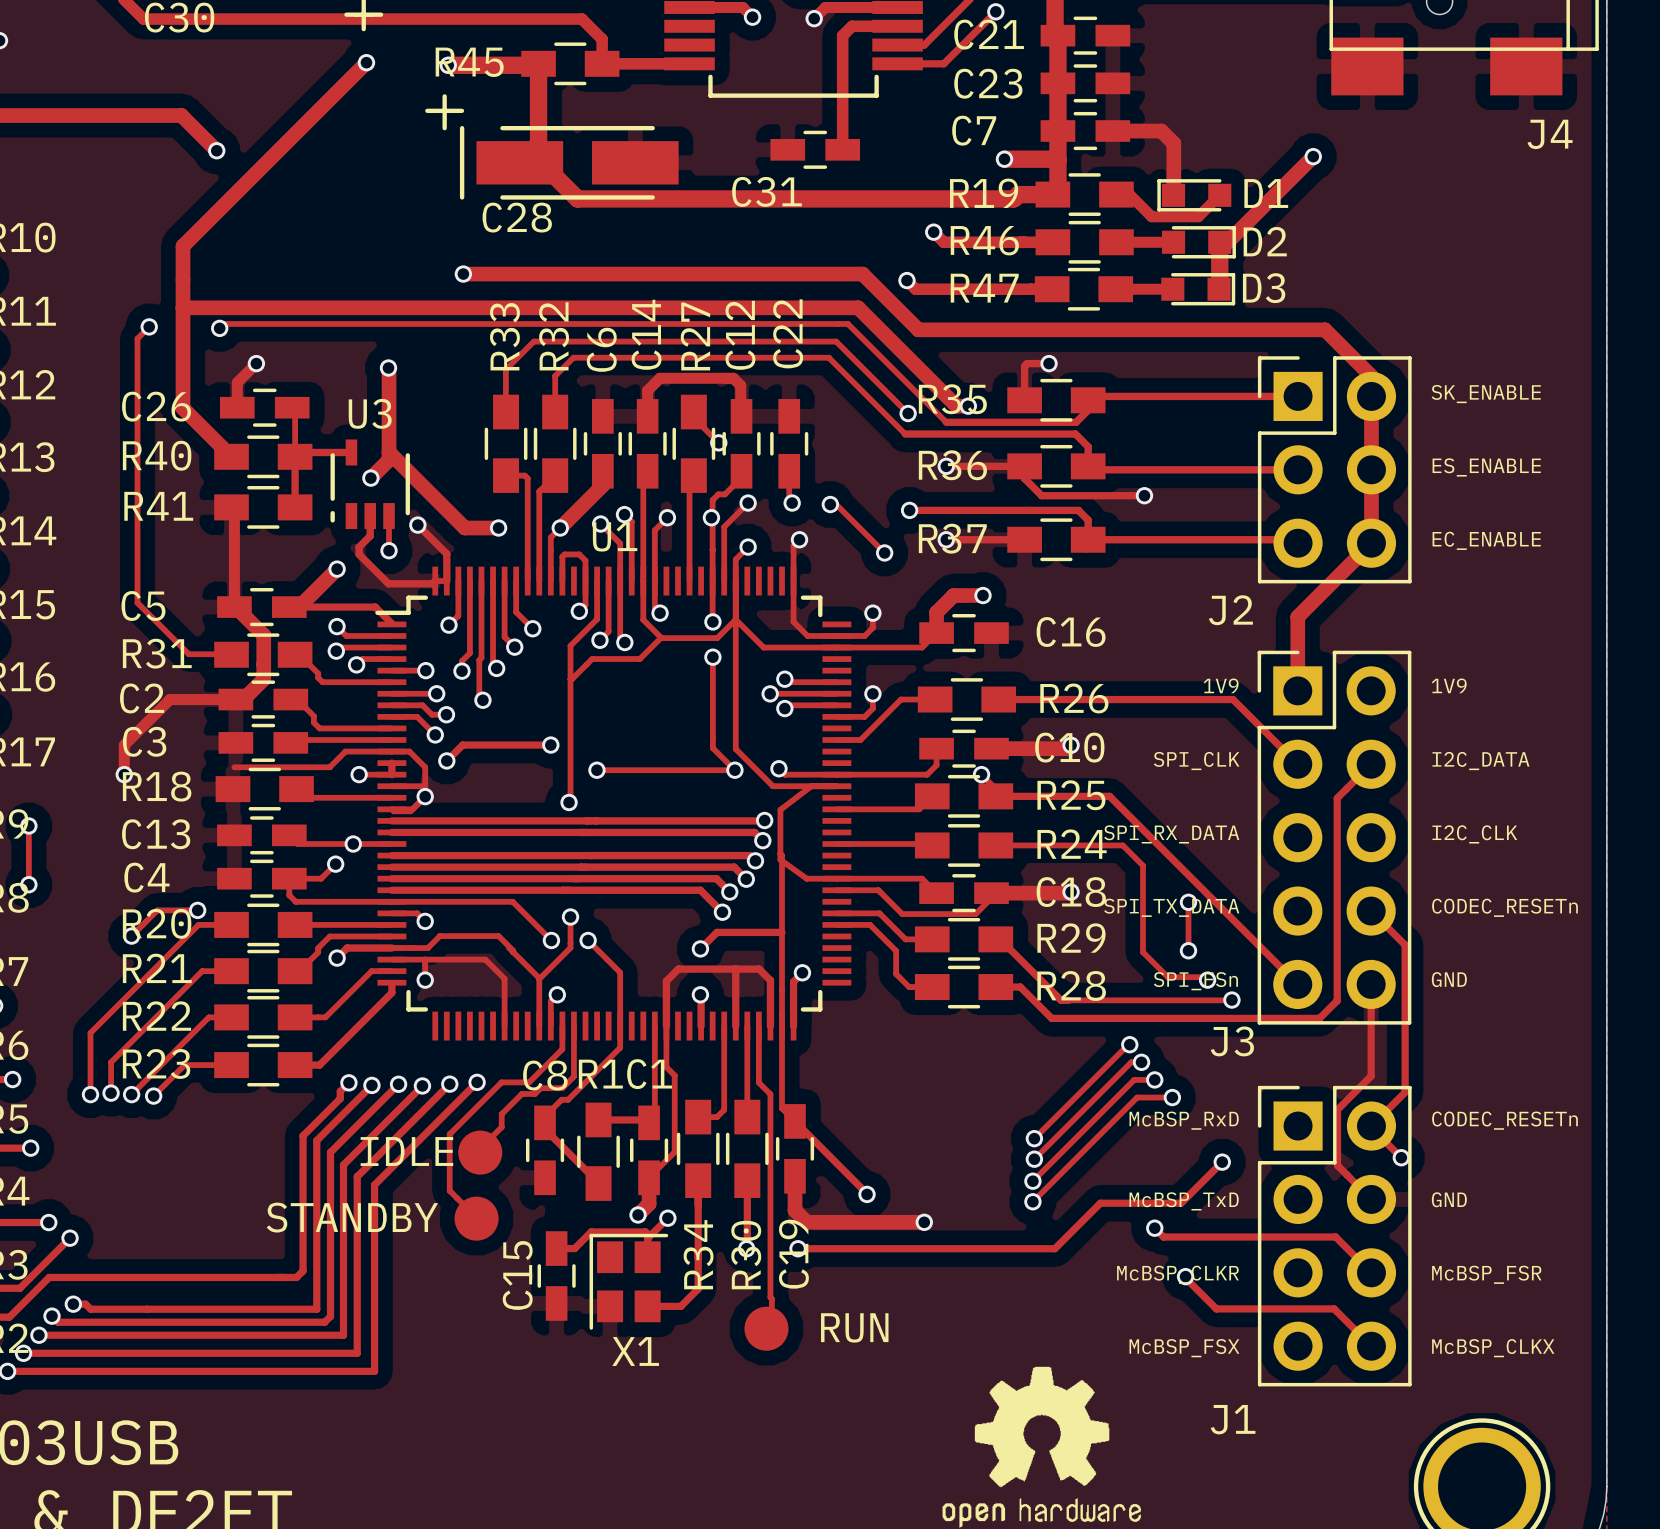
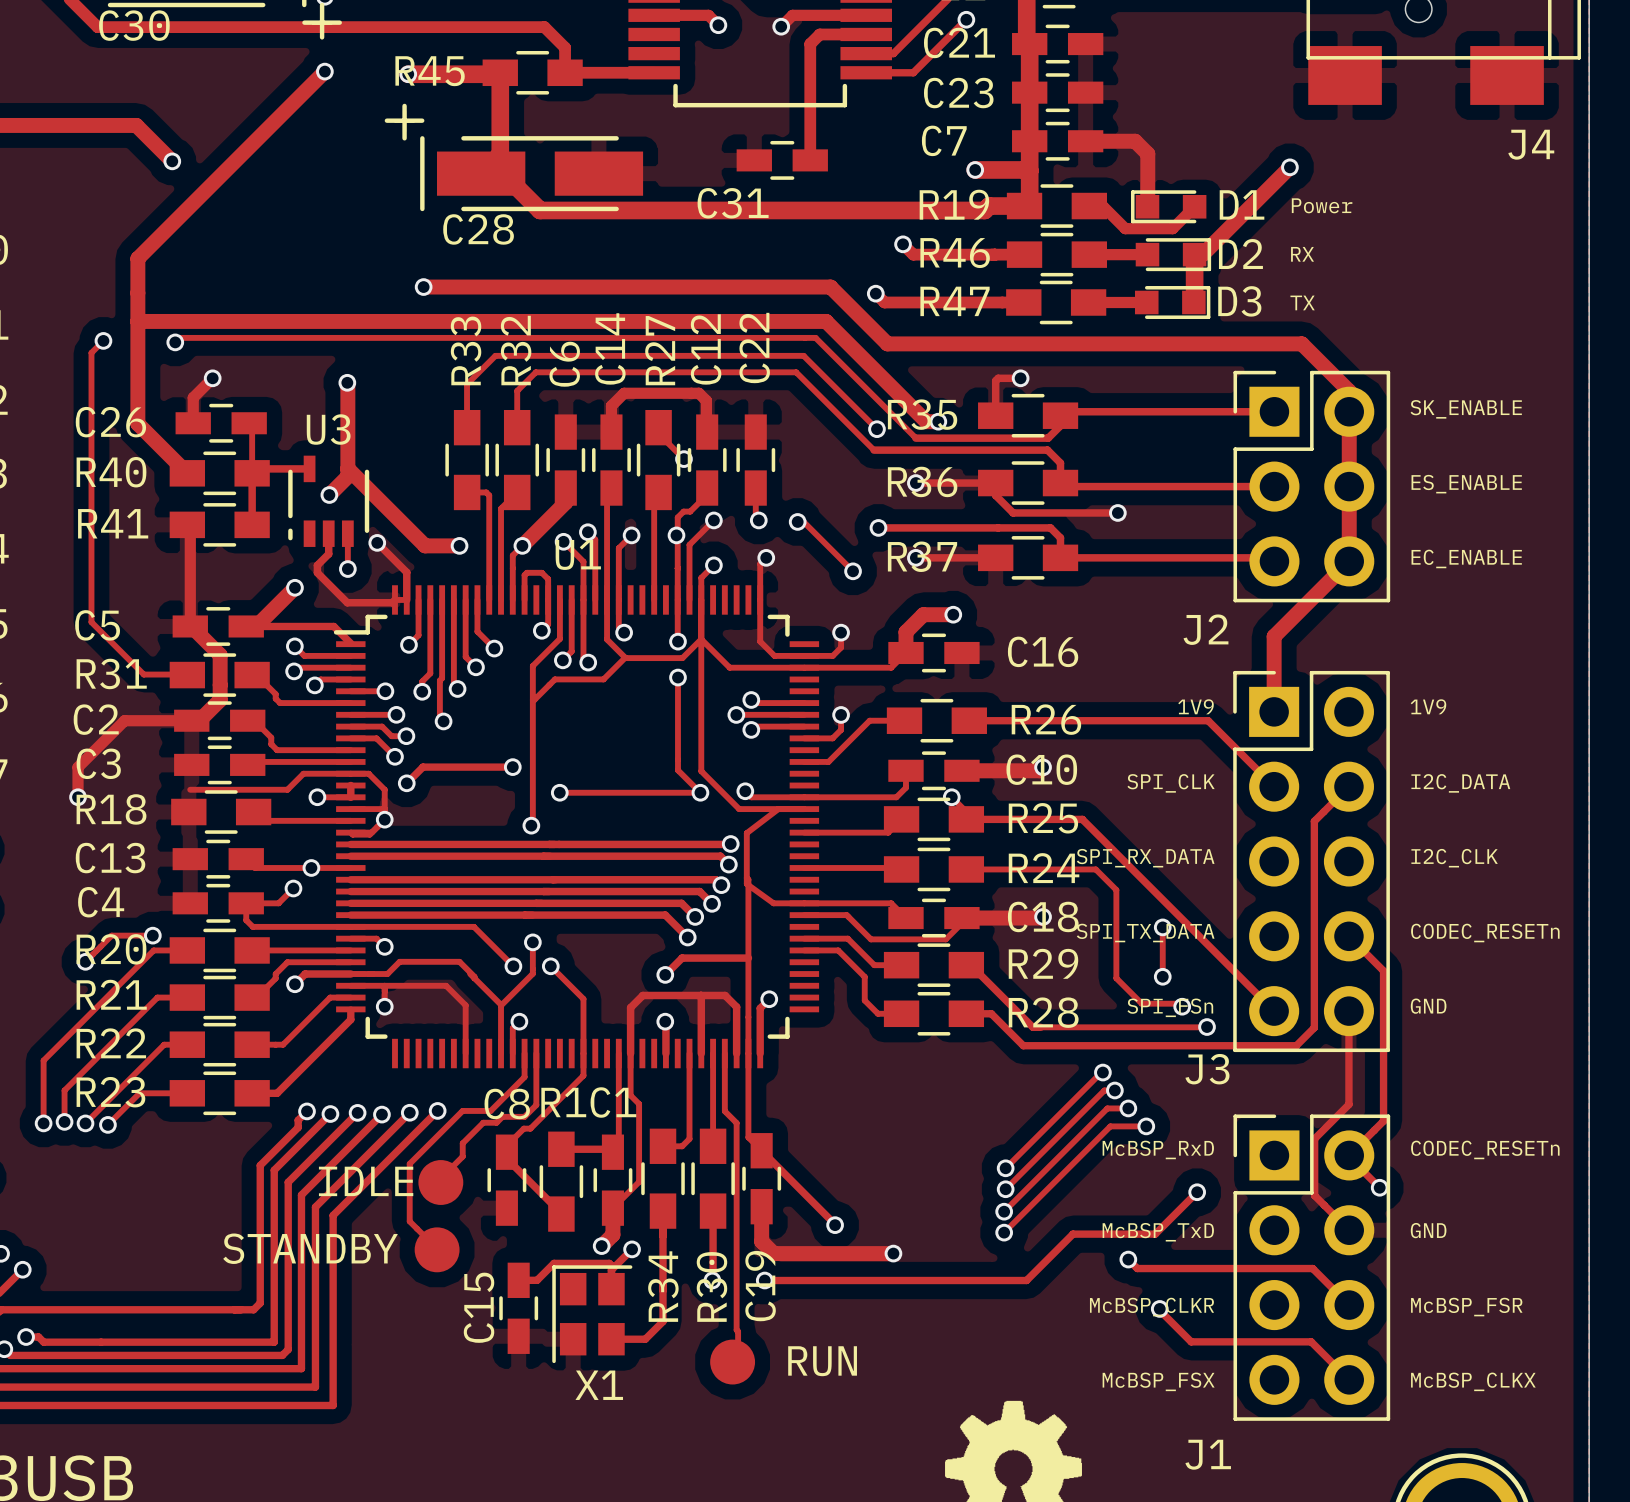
text: none -> Power (1322, 205)
text: none -> RX (1302, 254)
text: none -> TX (1302, 302)

